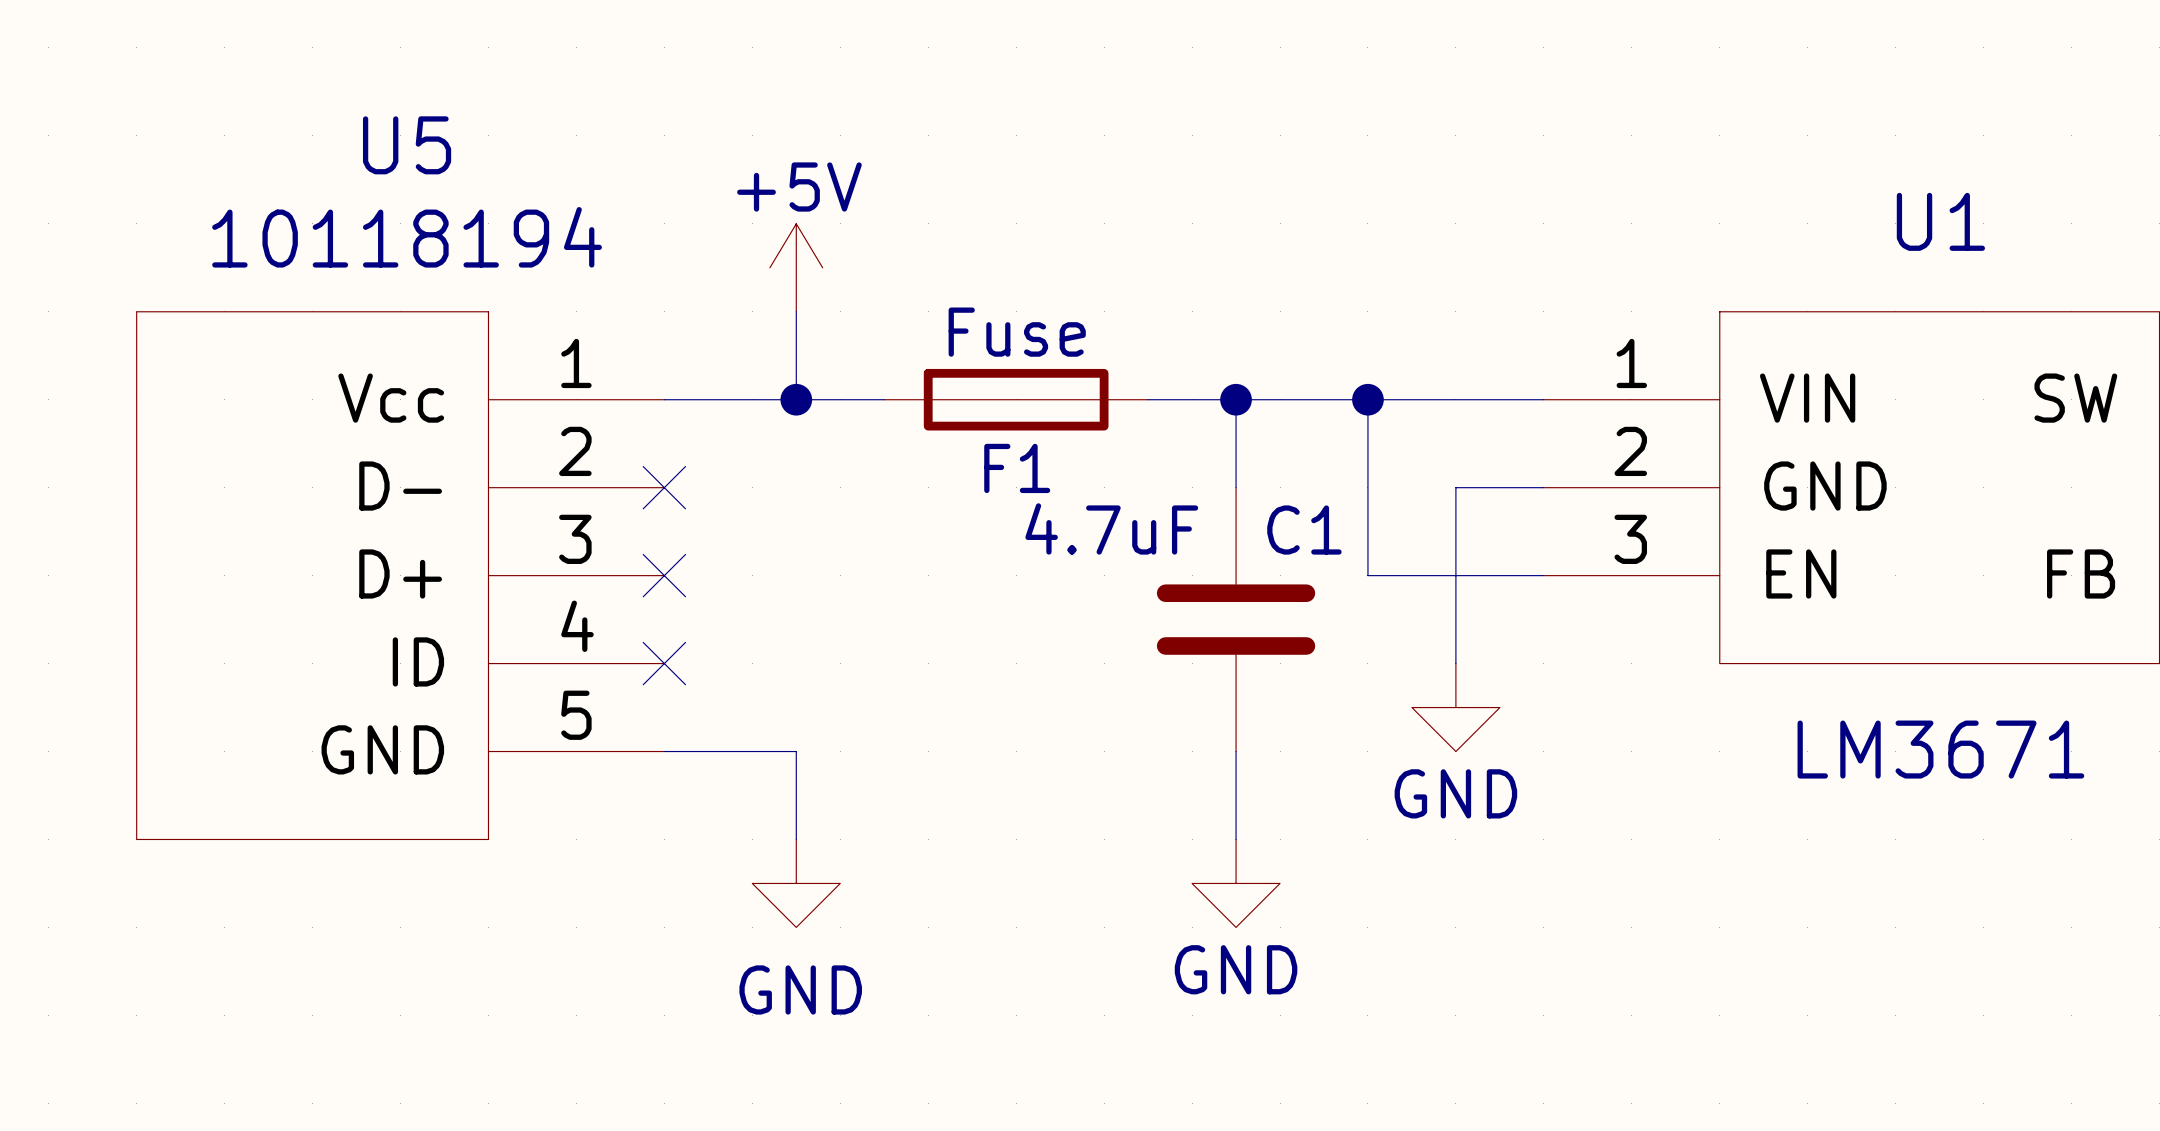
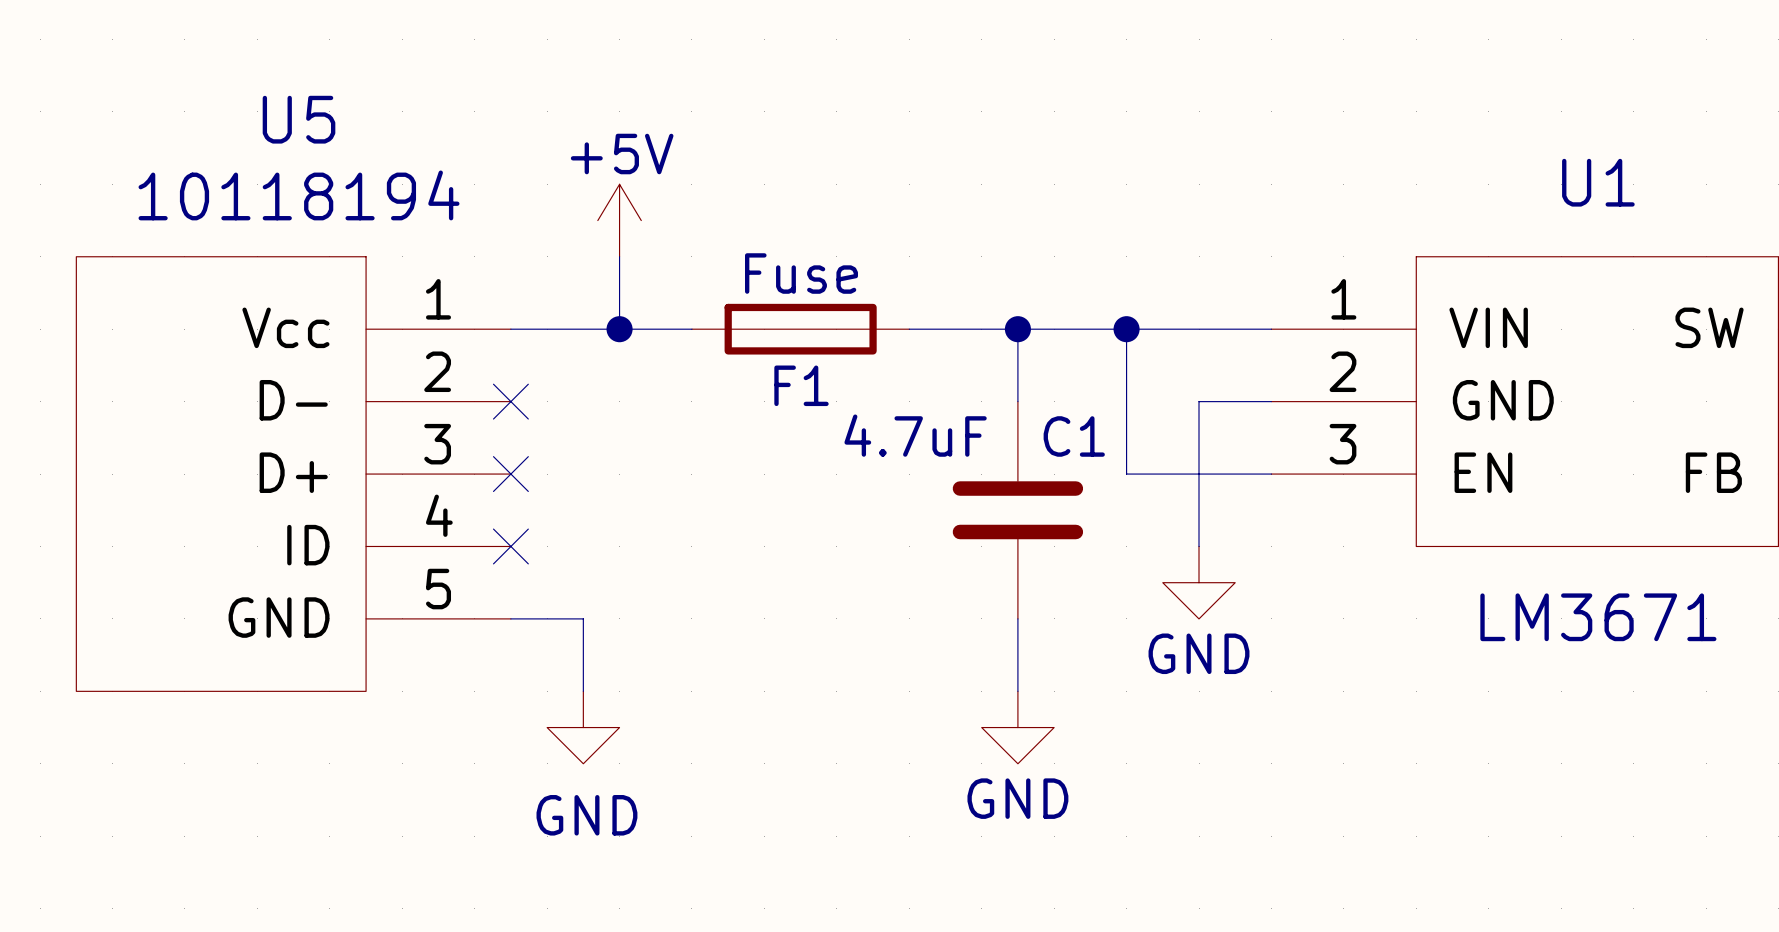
power symbol position: +5V (796, 267) -> +5V (619, 220)
wire: (796, 311) (796, 399) -> (619, 256) (619, 329)
junction position: (796, 399) -> (619, 329)
F1 position: (1016, 399) -> (800, 329)
no-connect mark position: (664, 487) -> (510, 401)
U5 position: (400, 575) -> (293, 474)
no-connect mark position: (664, 575) -> (510, 474)
no-connect mark position: (664, 663) -> (510, 546)
wire: (708, 751) (796, 751) (796, 839) -> (583, 618) (583, 691)
power symbol position: GND (796, 883) -> GND (583, 727)

